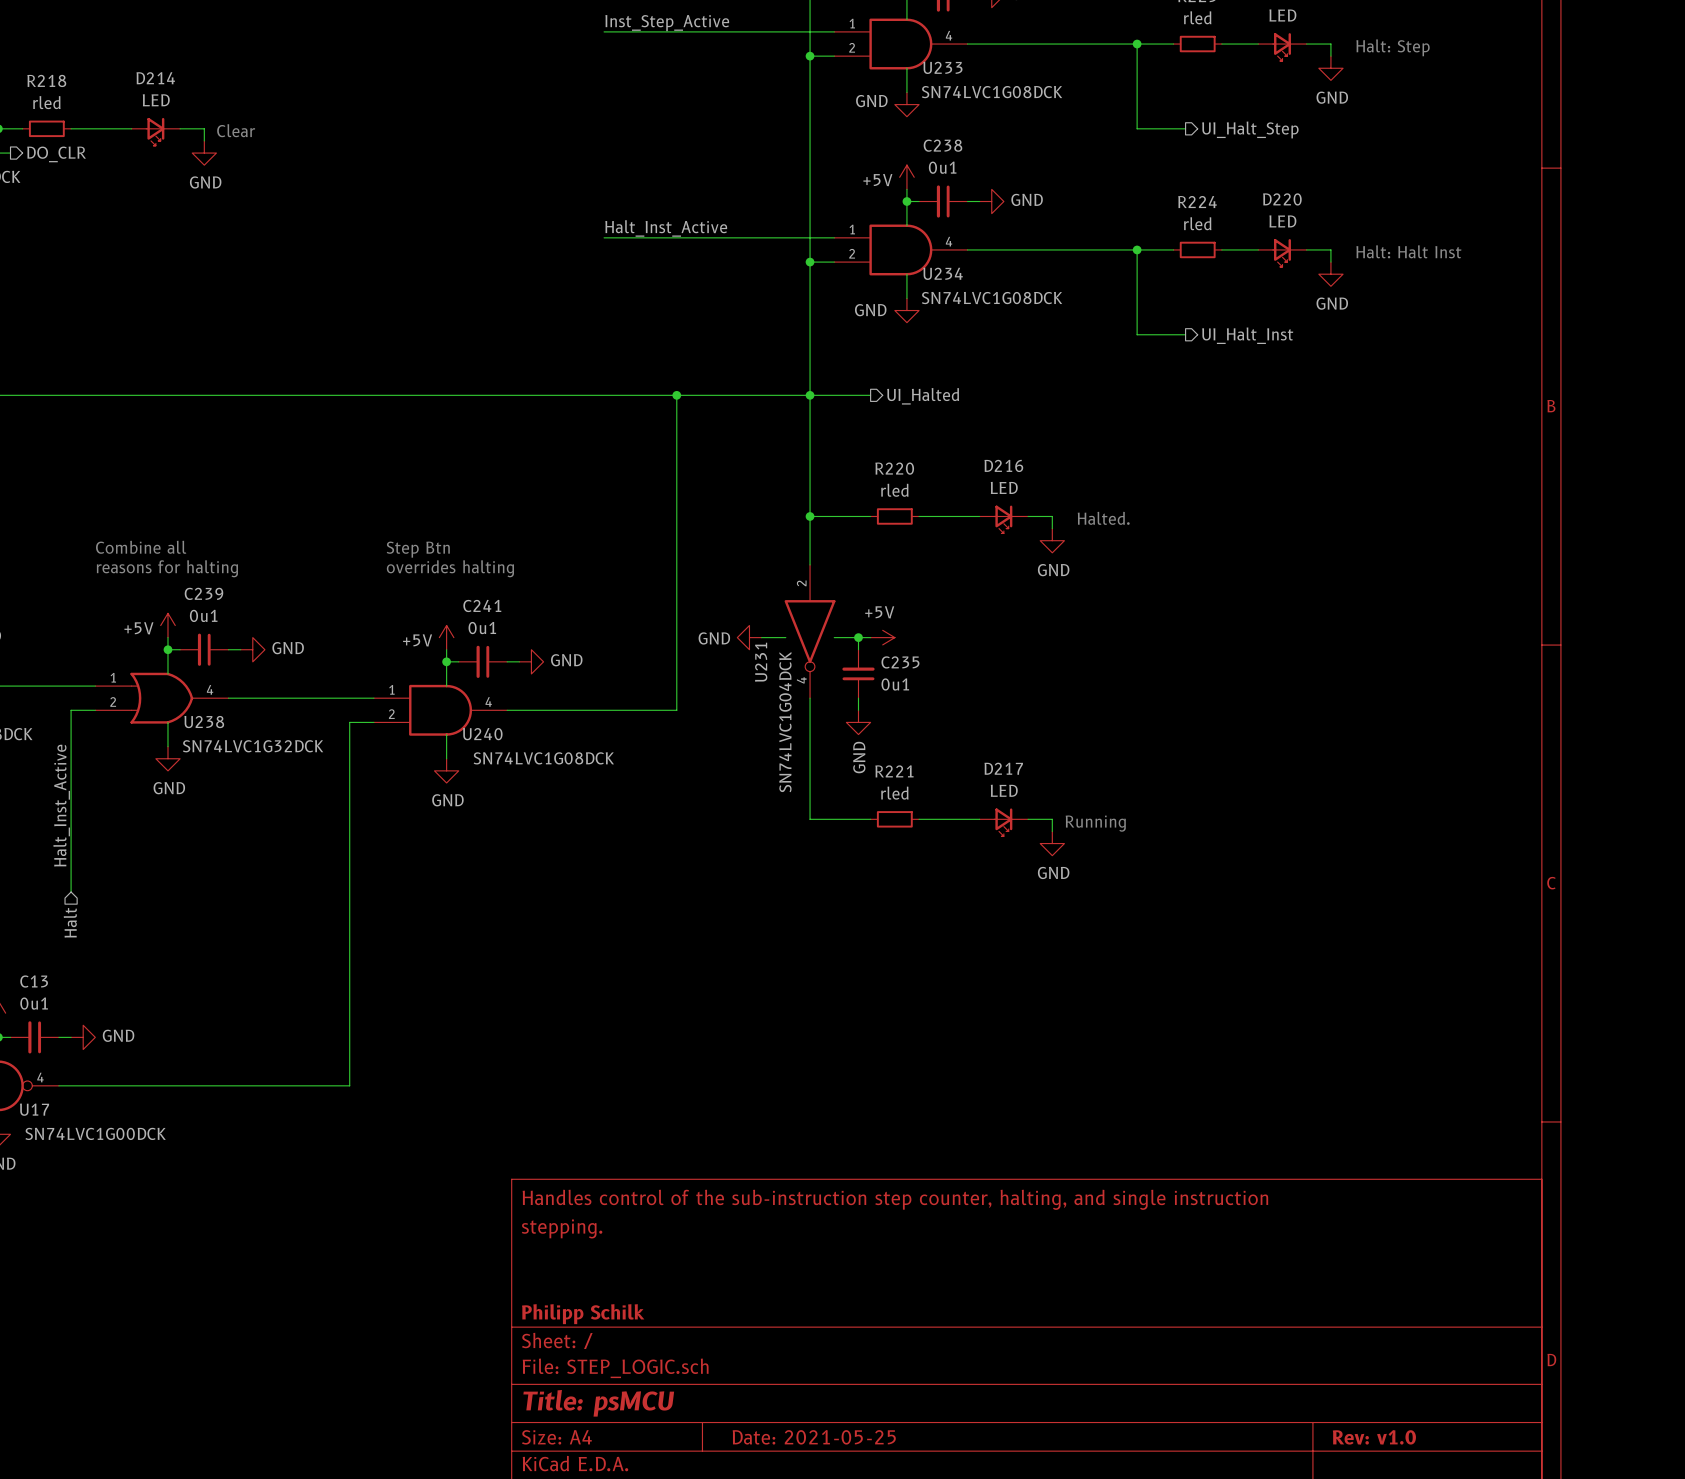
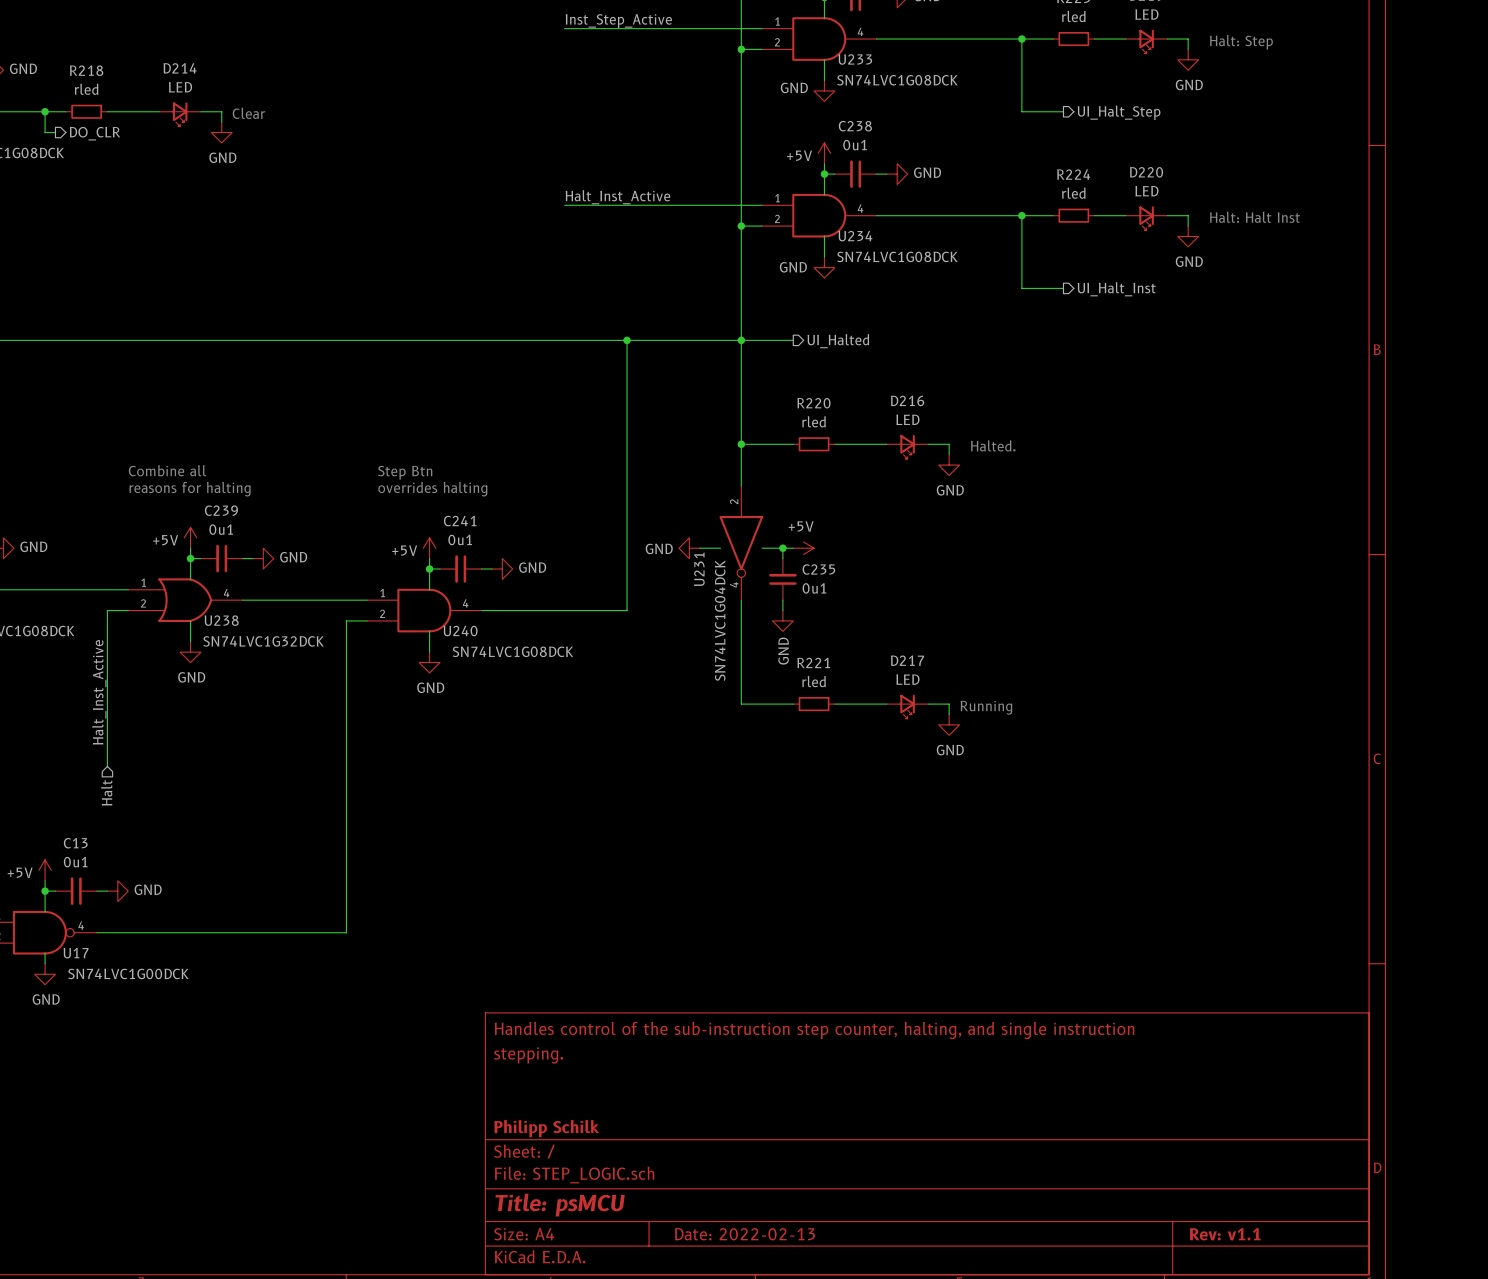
title block: Date: 2021-05-25 (814, 1437) -> Date: 2022-02-13 (744, 1234)
title block: Rev: v1.0 (1374, 1437) -> Rev: v1.1 (1225, 1234)

